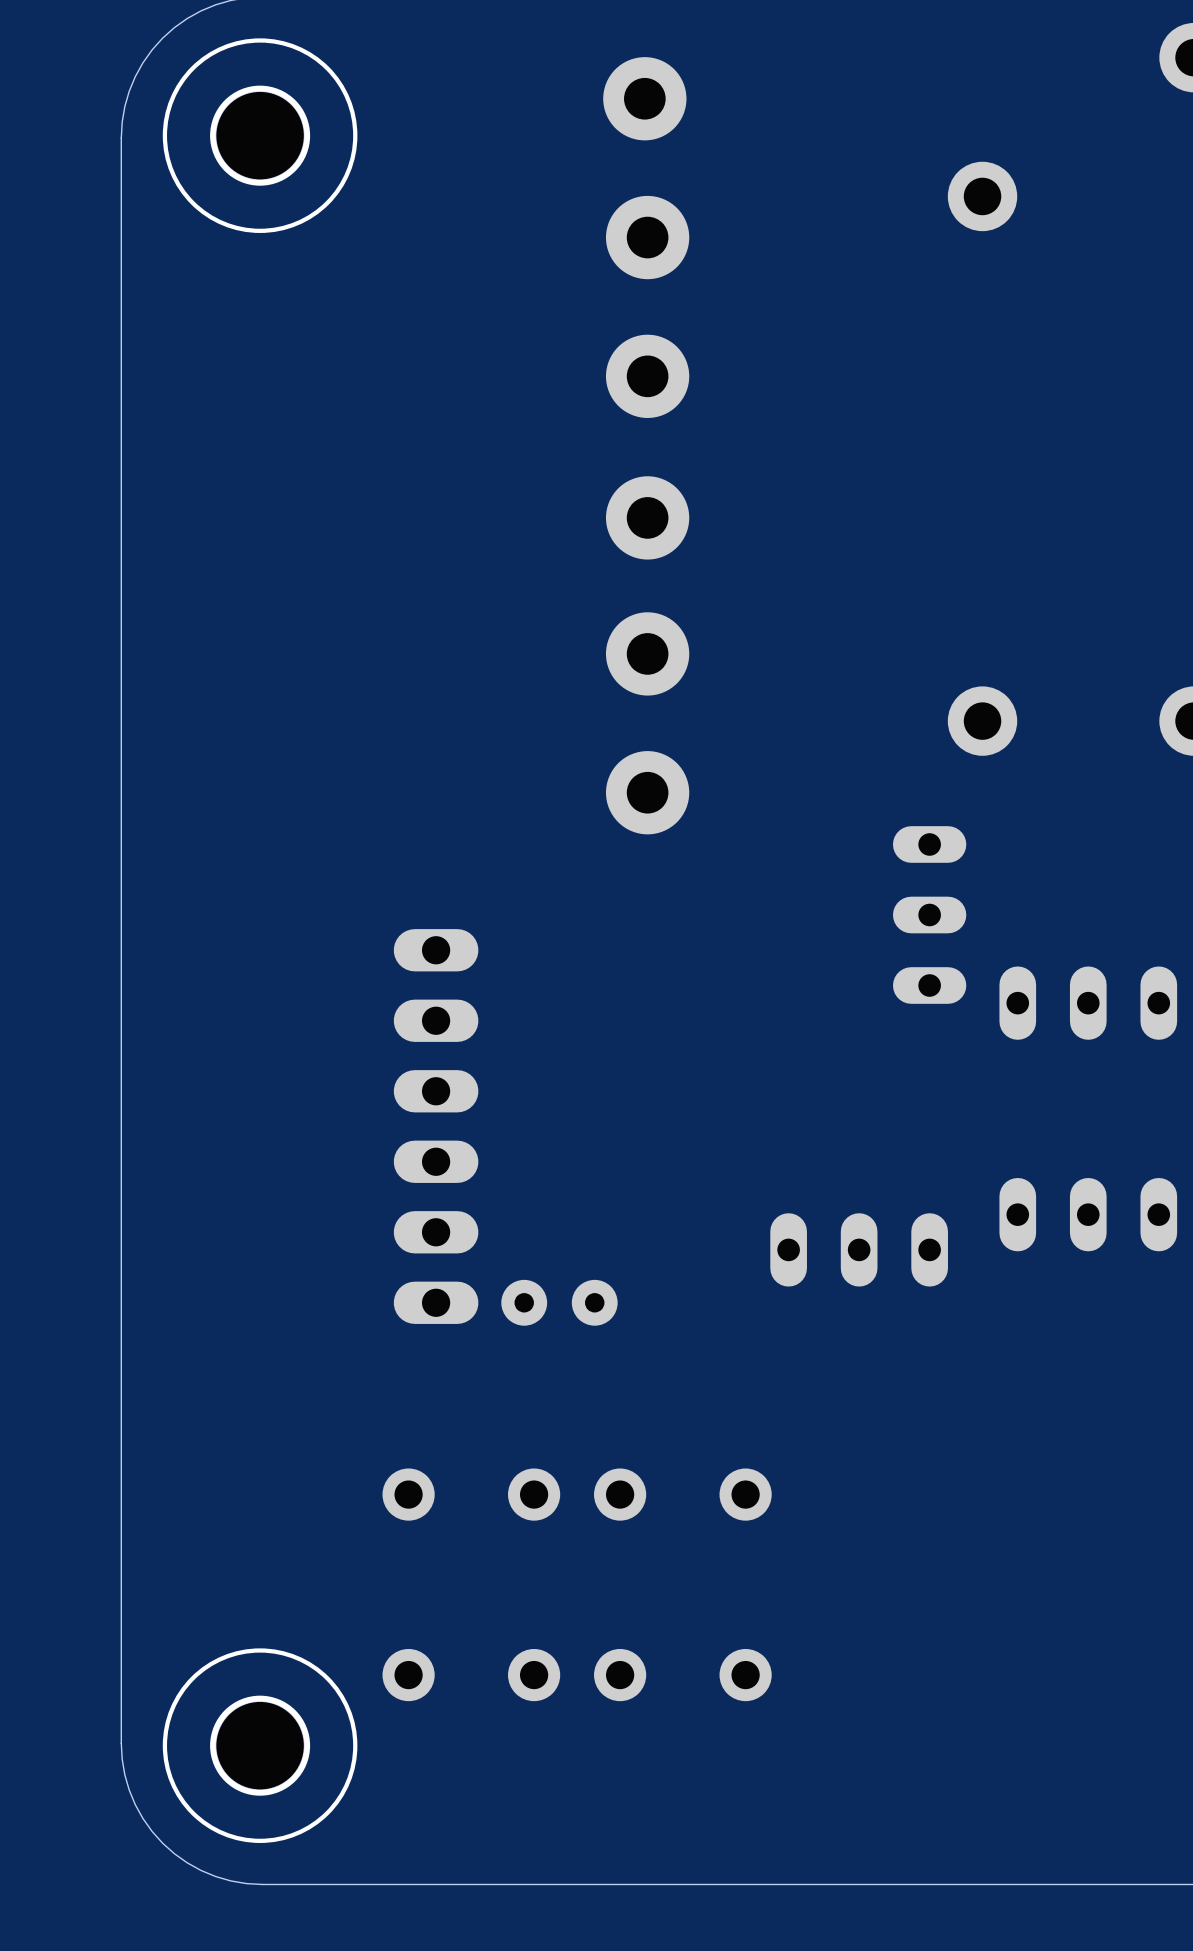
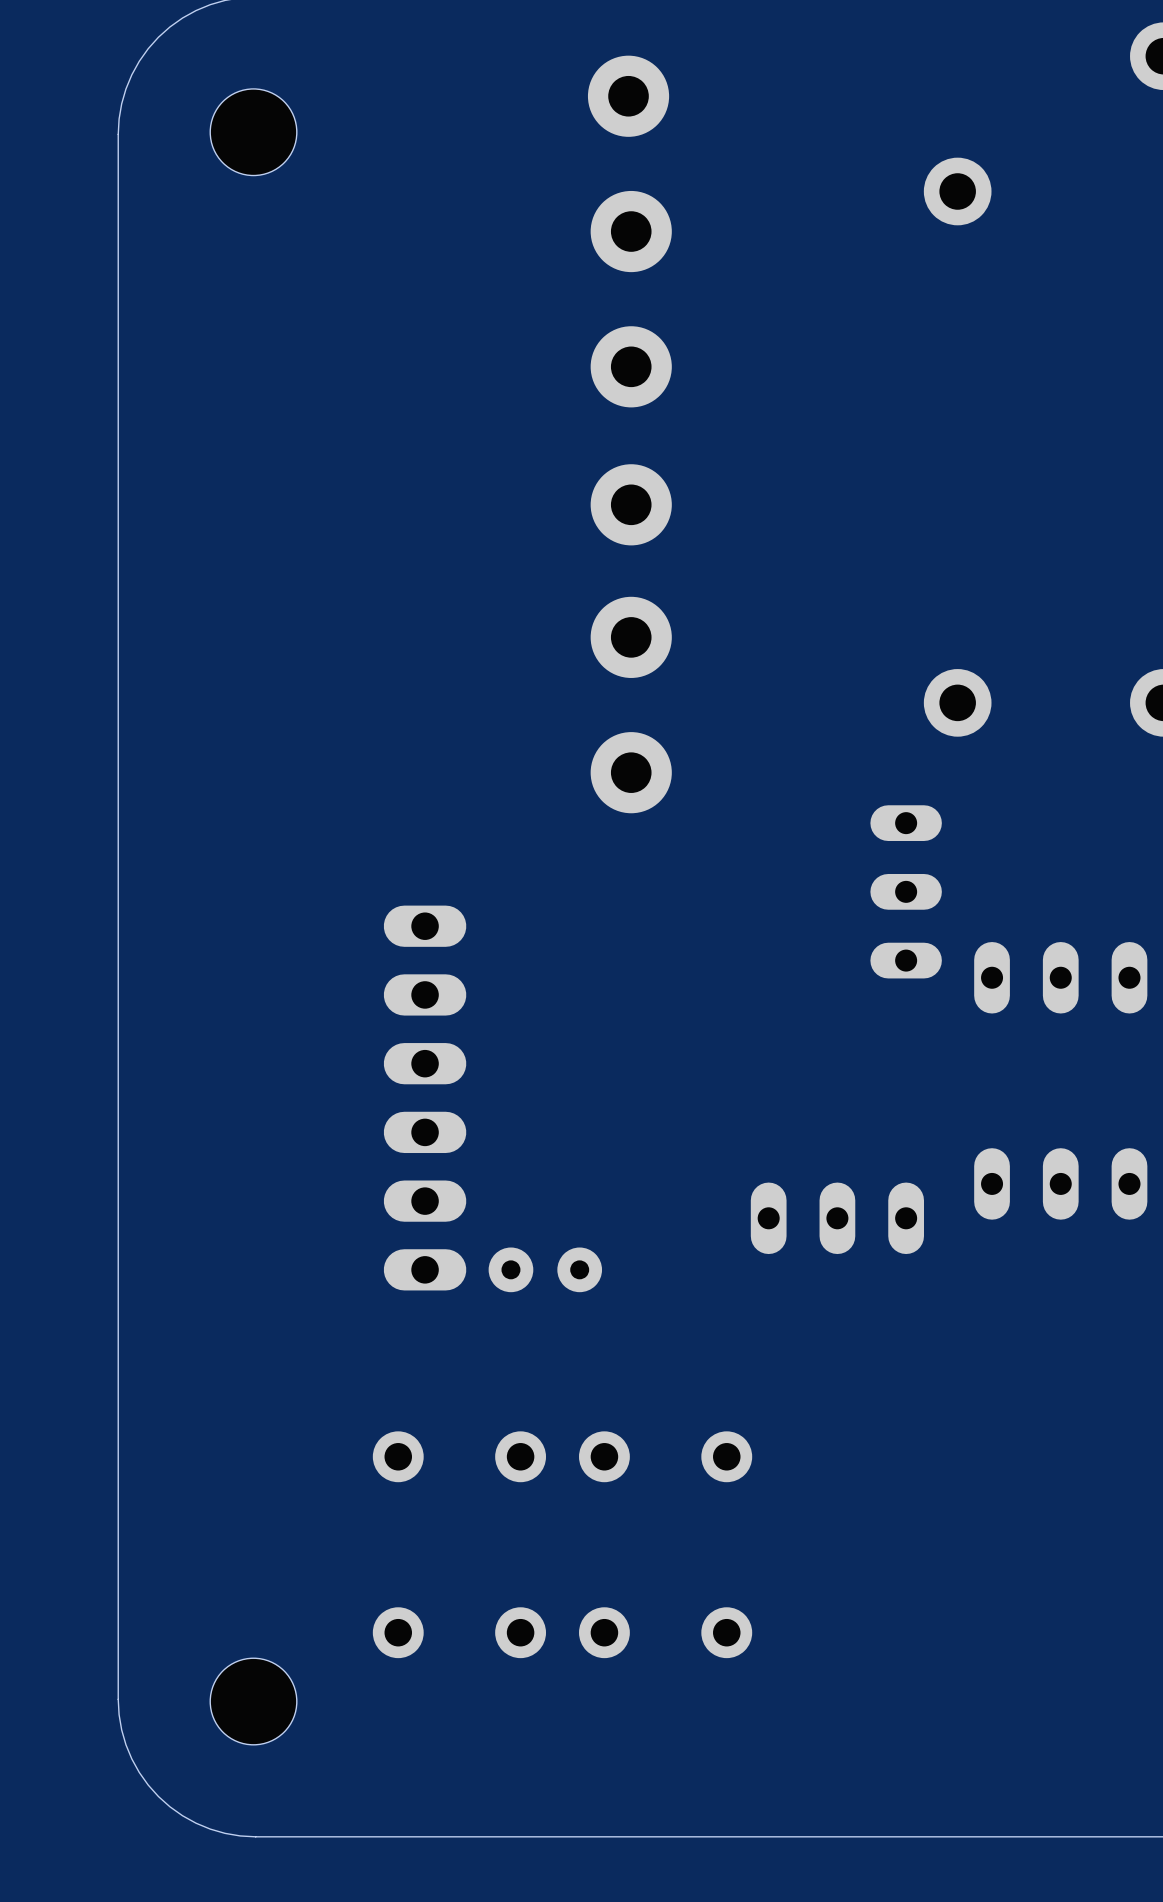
part side: bottom (260, 135) -> top (253, 132)
part side: bottom (260, 1745) -> top (253, 1701)

